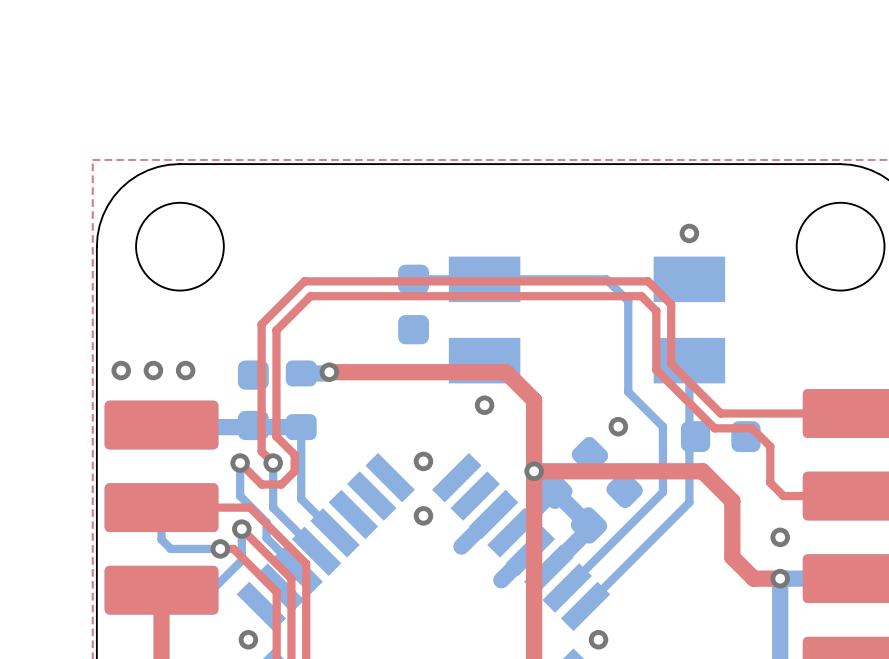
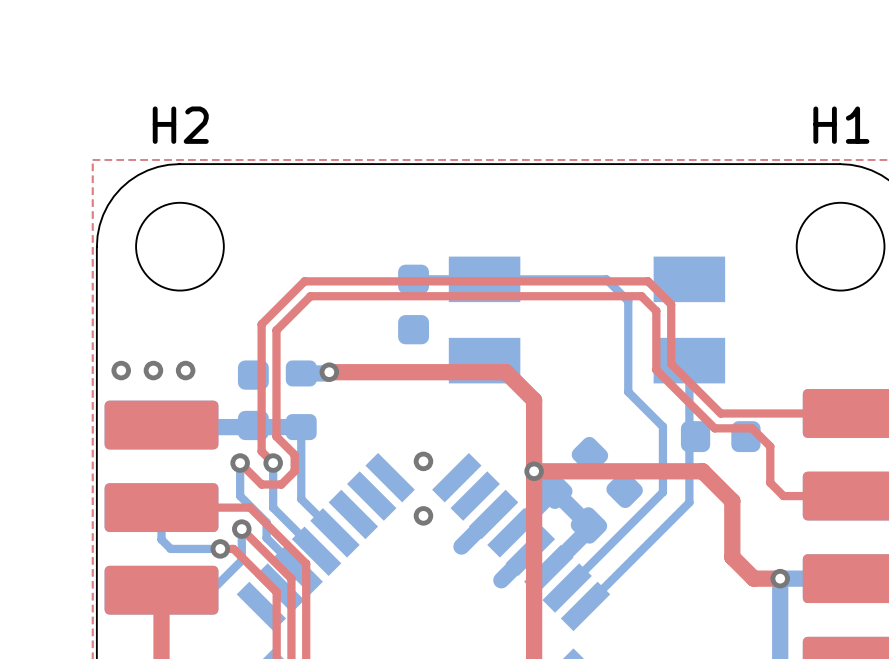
H2 name: none -> H2 (180, 125)
H1 name: none -> H1 (841, 125)
via: (689, 233) -> none
via: (484, 405) -> none
via: (618, 426) -> none
via: (780, 537) -> none
via: (248, 639) -> none
via: (598, 639) -> none

